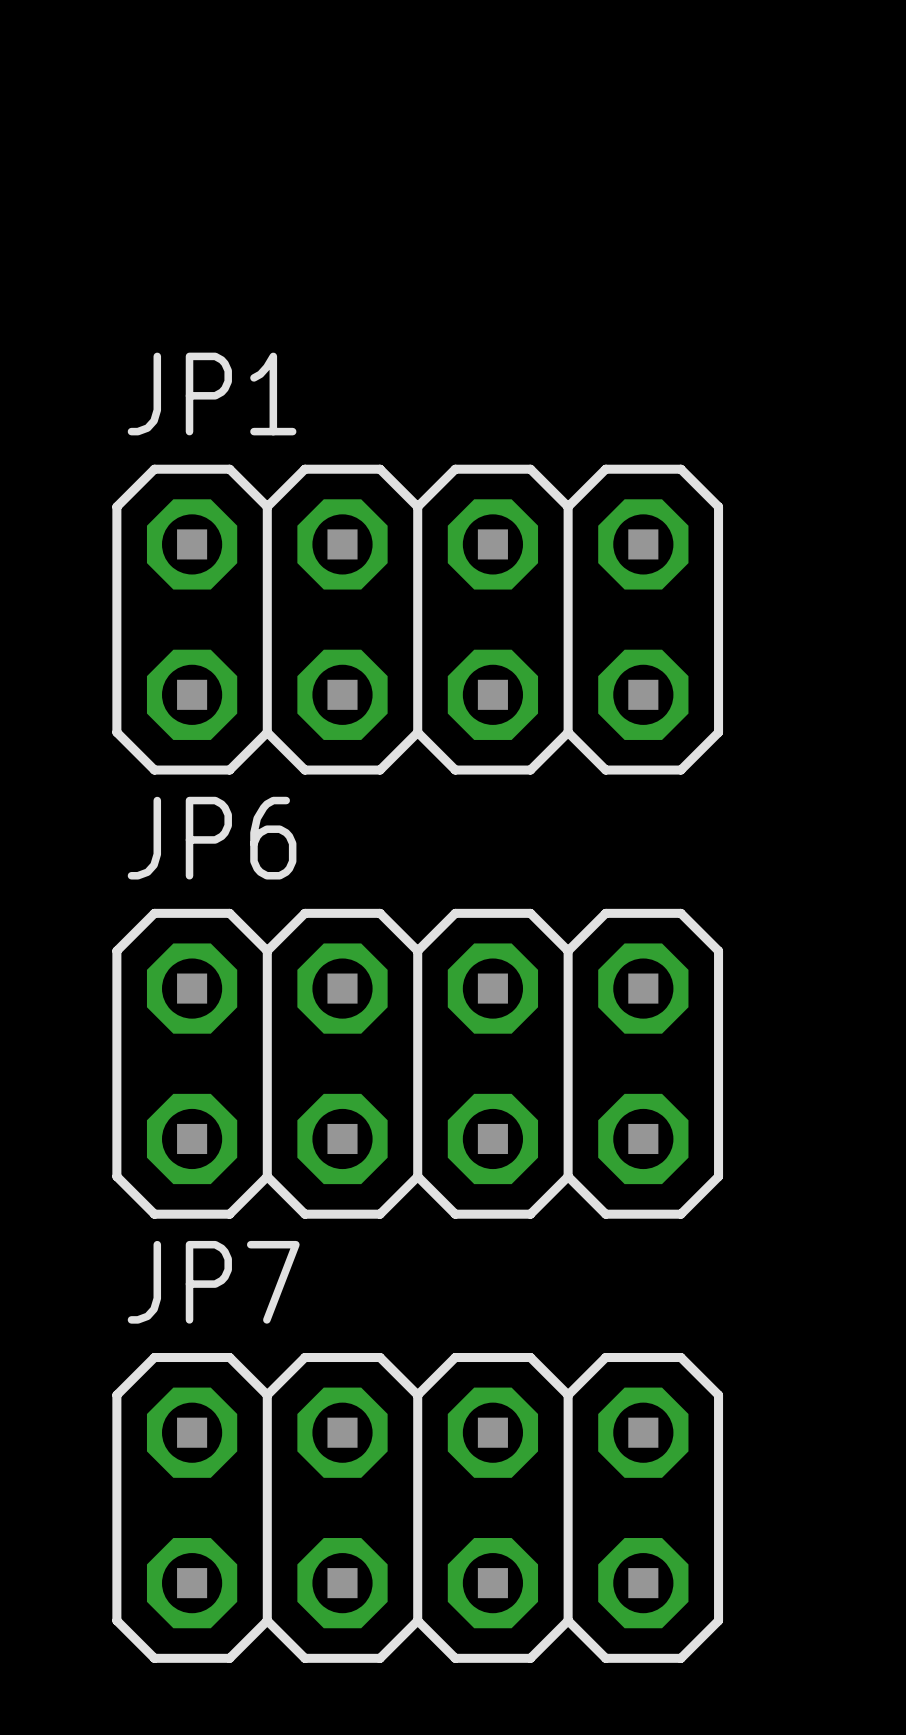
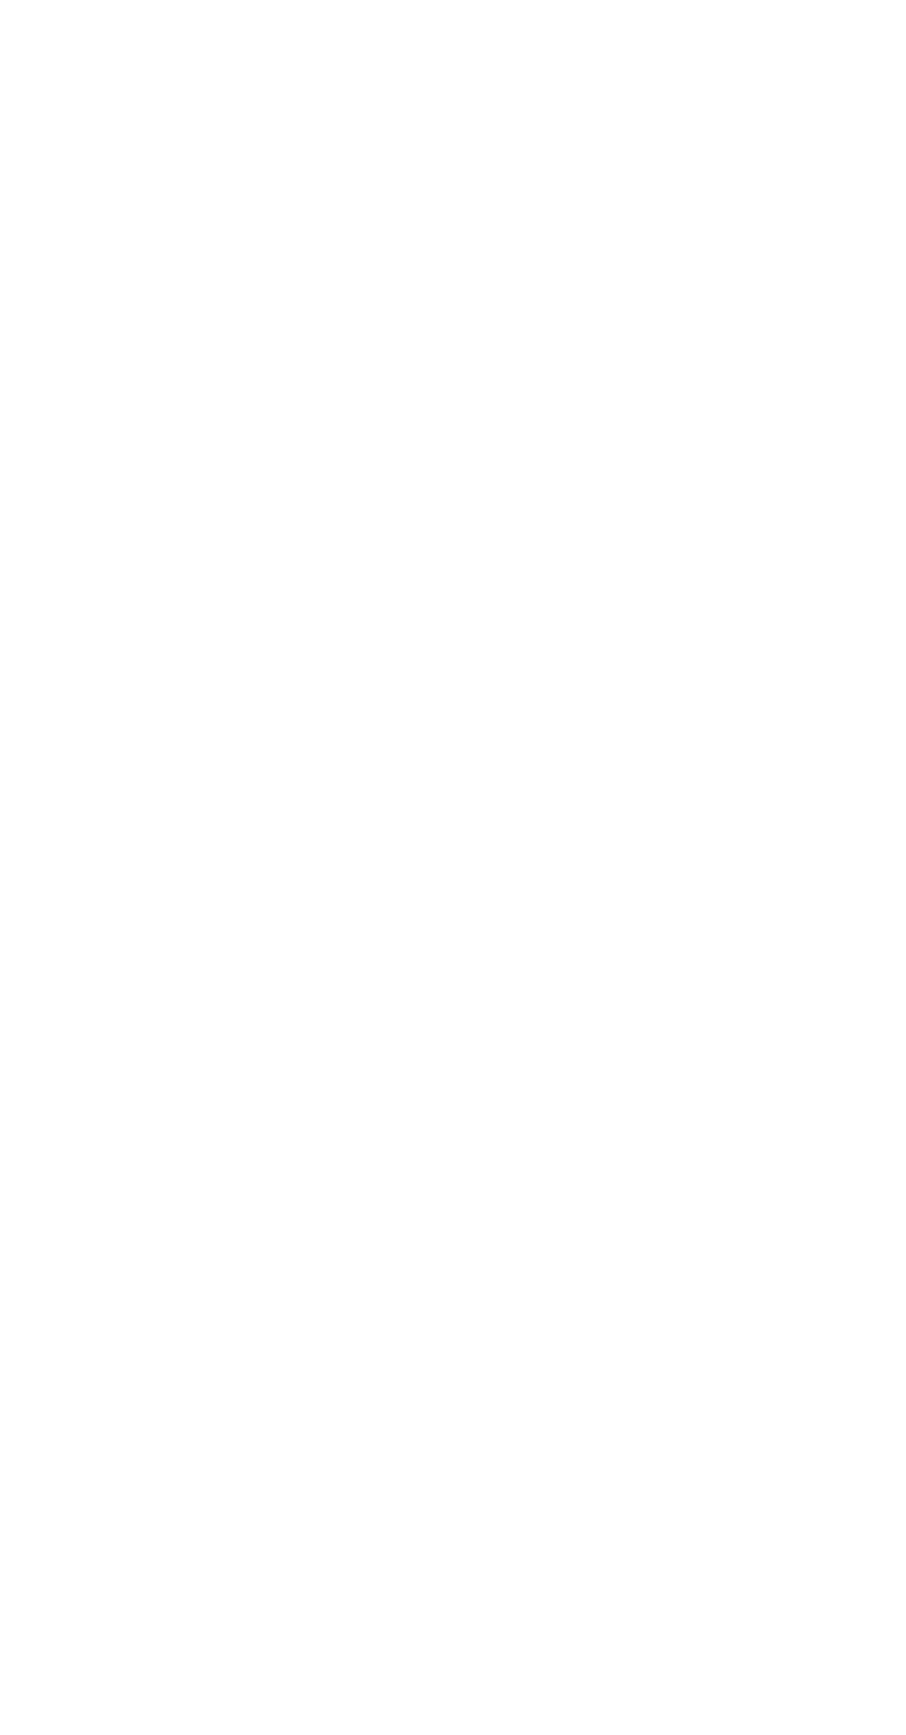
JP1: (417, 619) -> none
JP6: (417, 1063) -> none
JP7: (417, 1507) -> none

